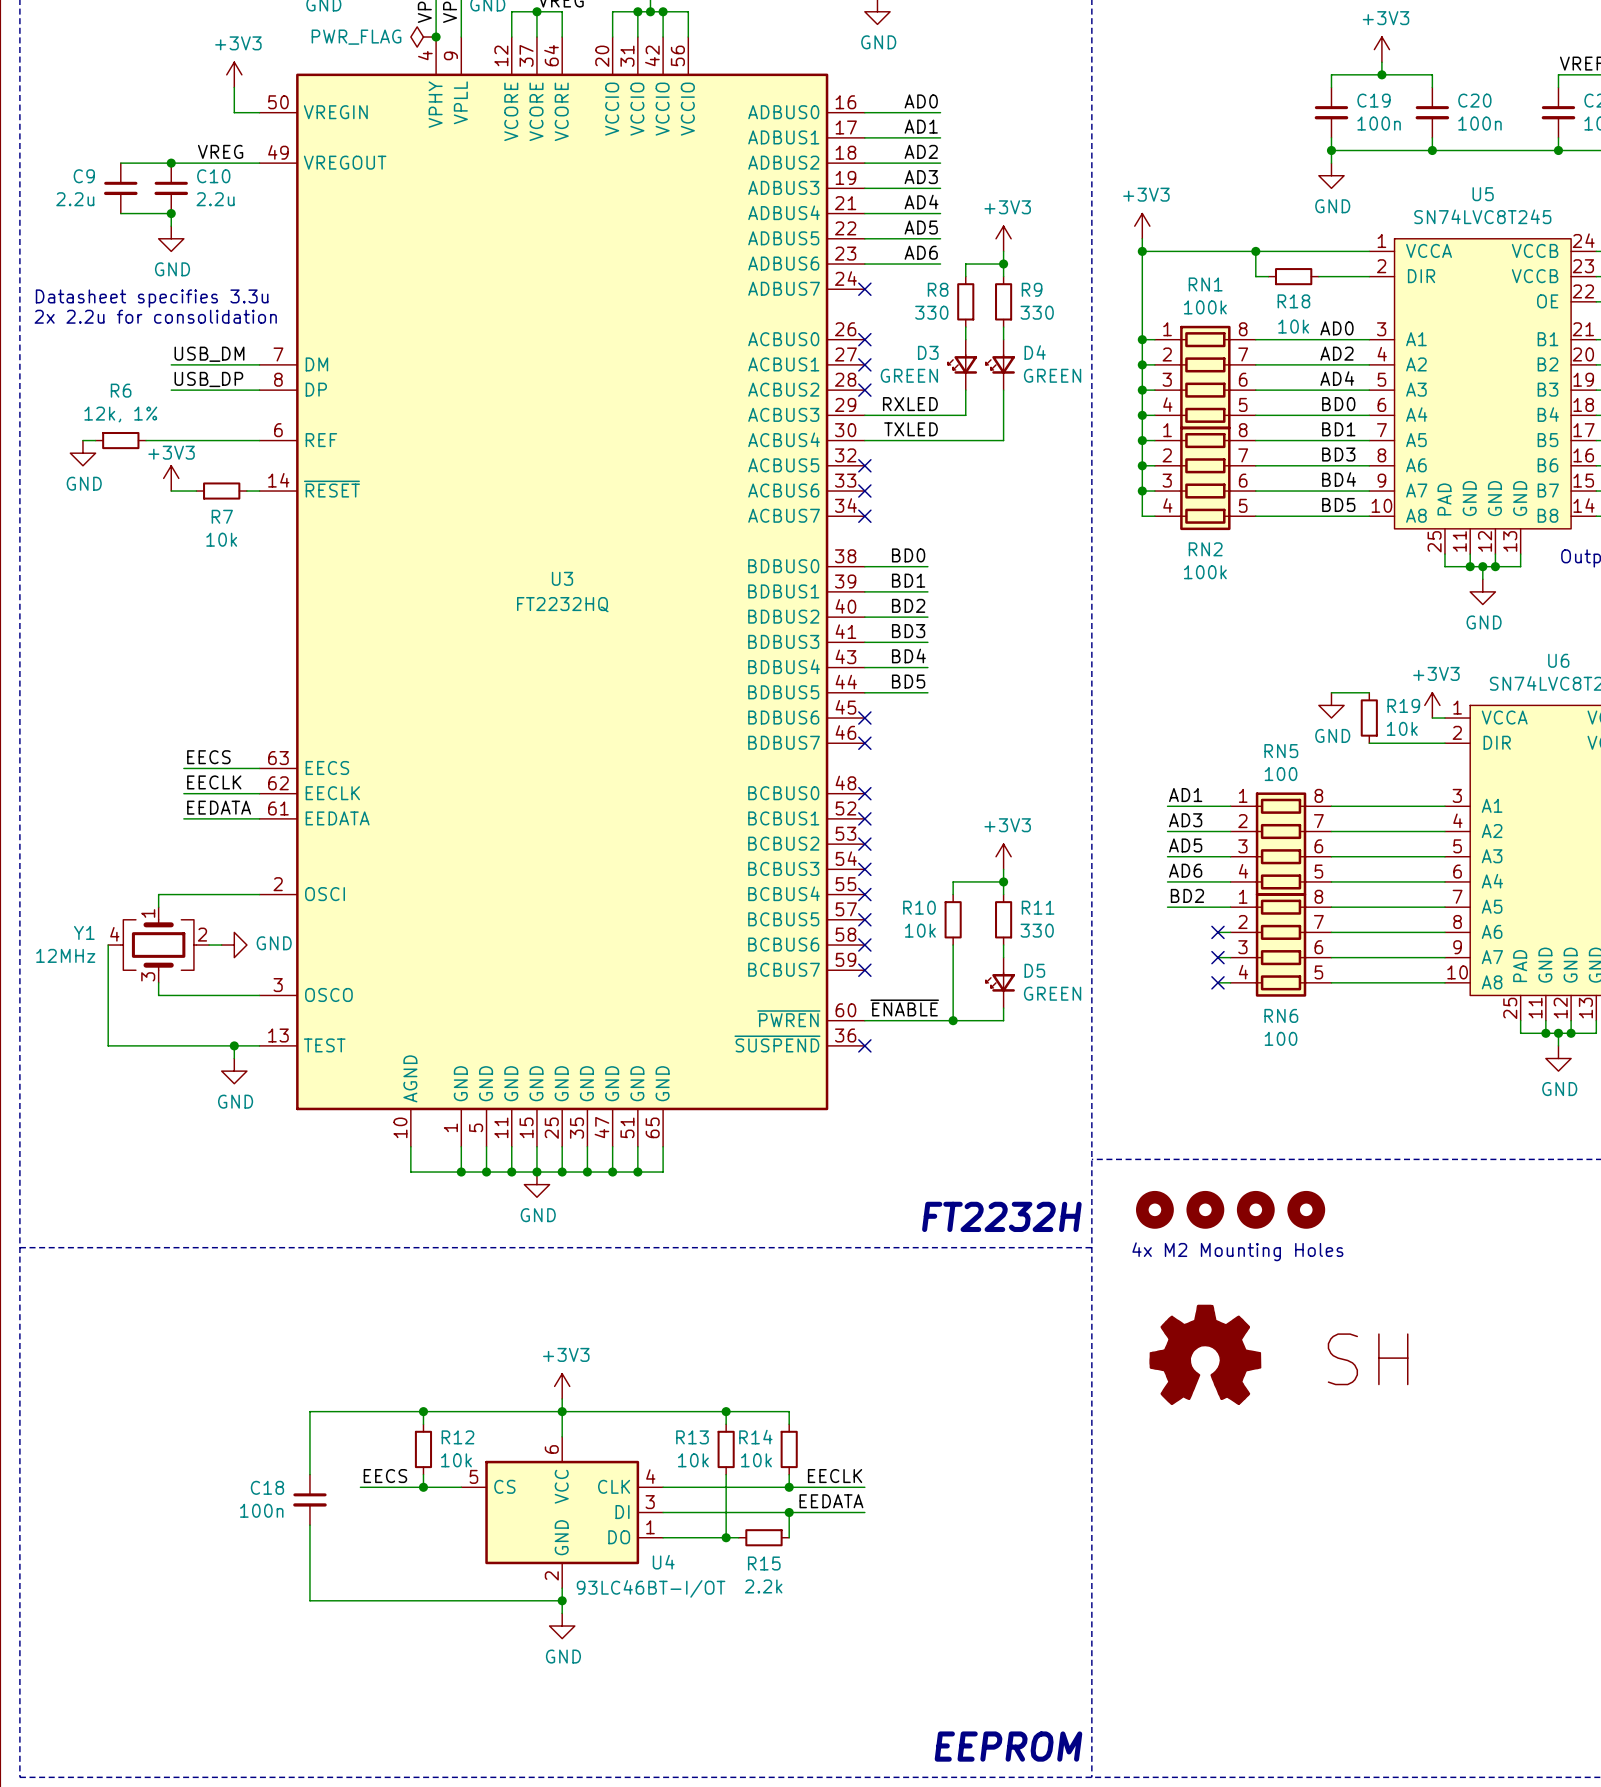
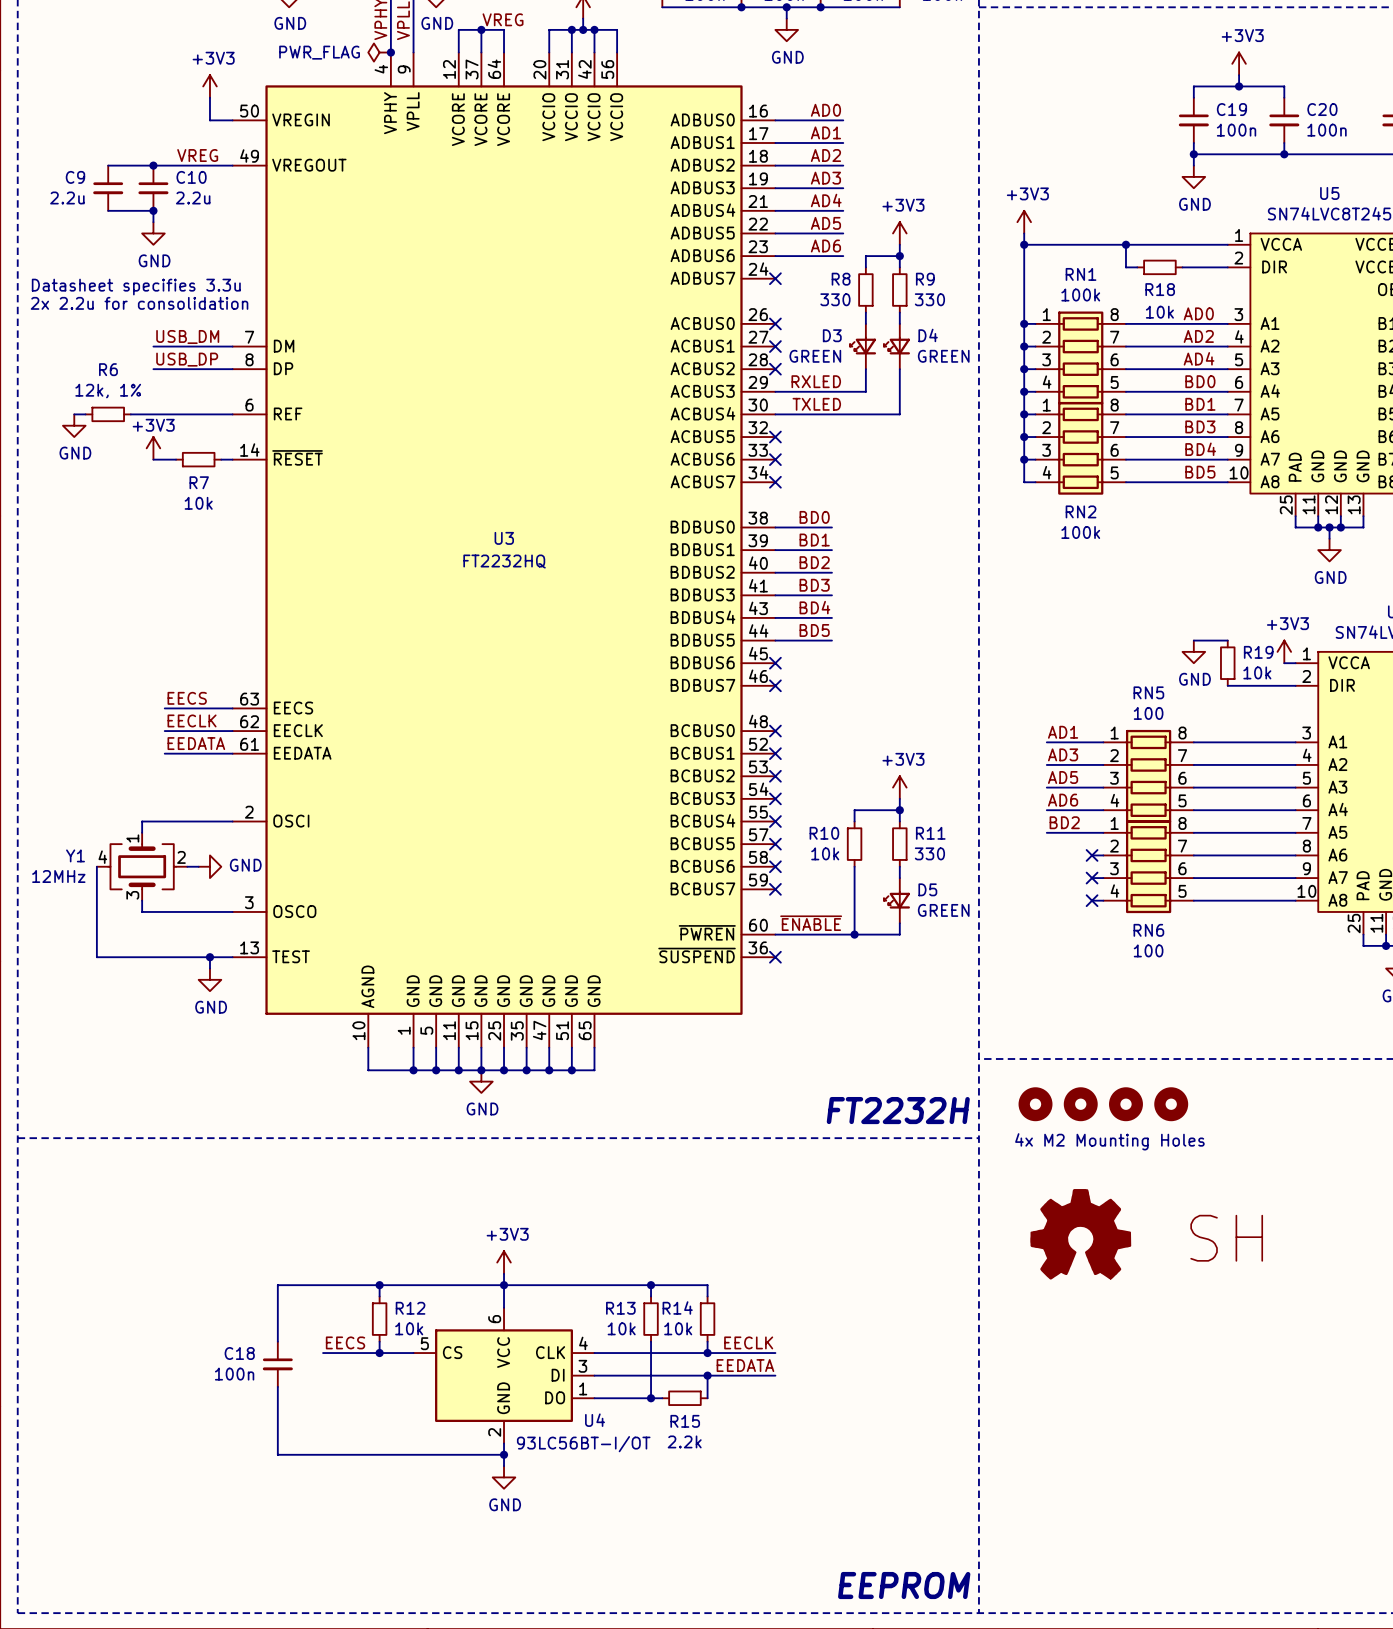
U4 value: 93LC46BT-I/OT (651, 1588) -> 93LC56BT-I/OT (583, 1444)

